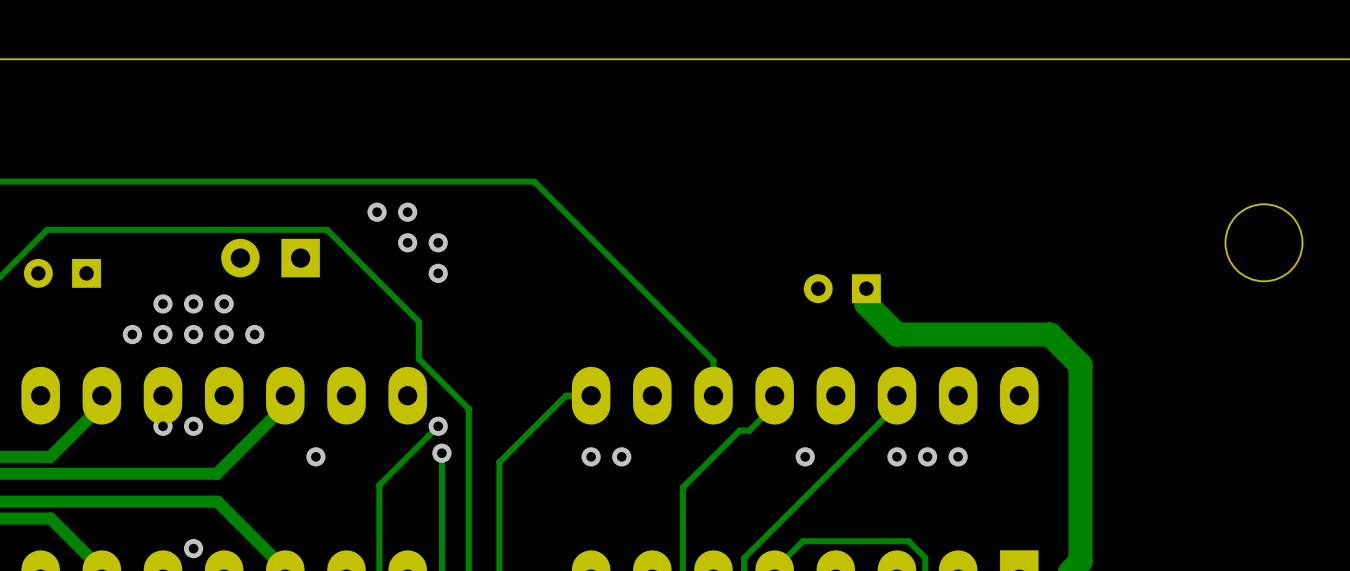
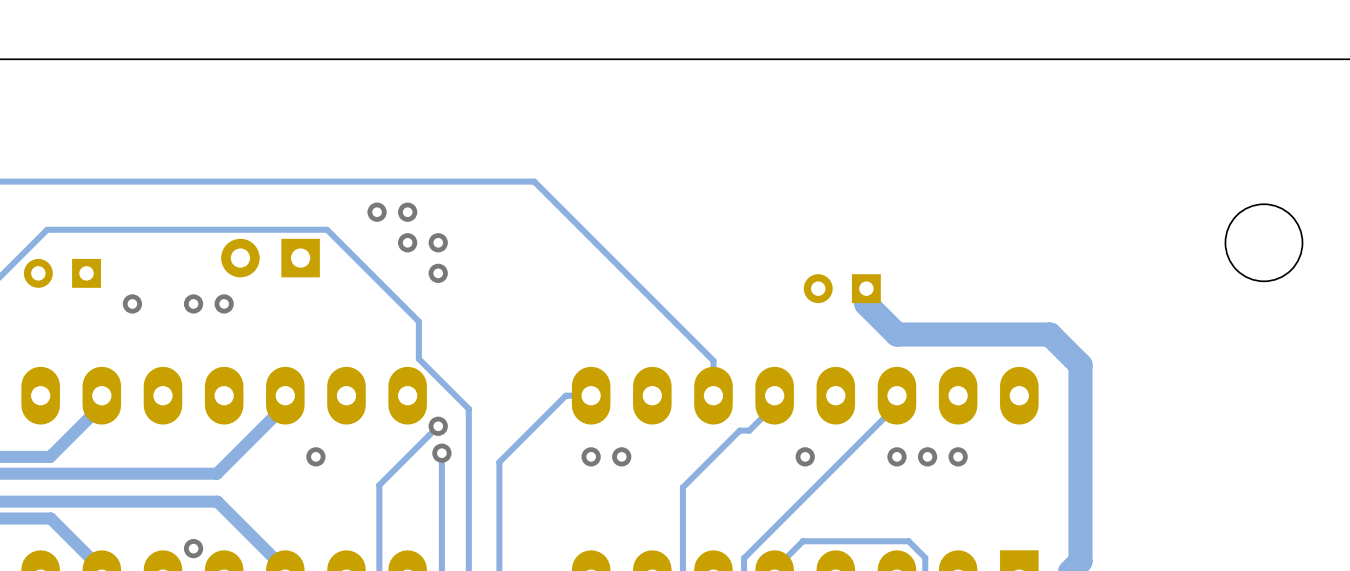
via: none -> (132, 303)
via: (162, 303) -> none
via: (132, 334) -> none
via: (162, 334) -> none
via: (193, 334) -> none
via: (224, 334) -> none
via: (254, 334) -> none
via: (162, 426) -> none
via: (193, 426) -> none

